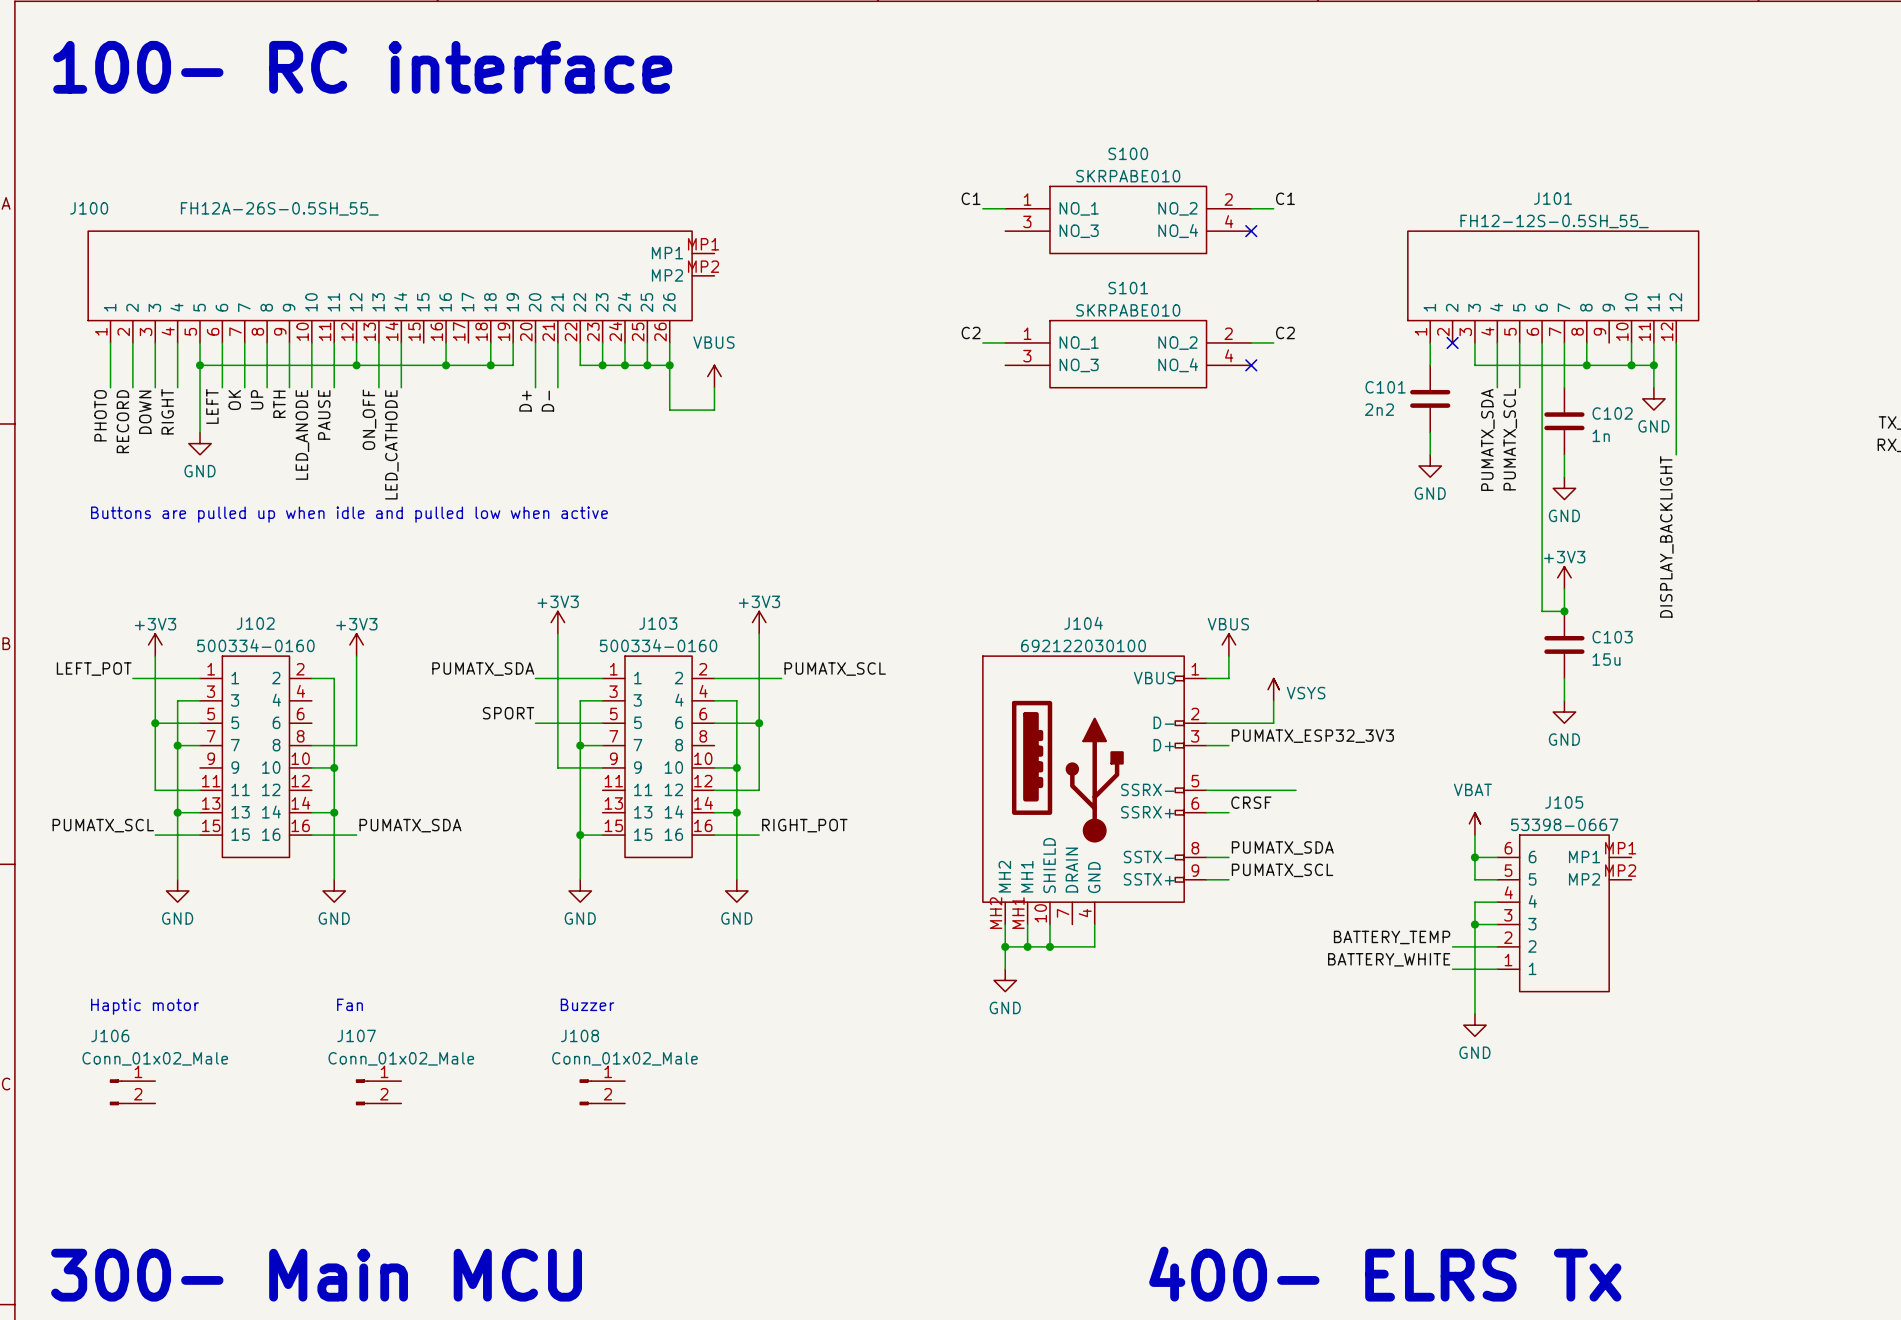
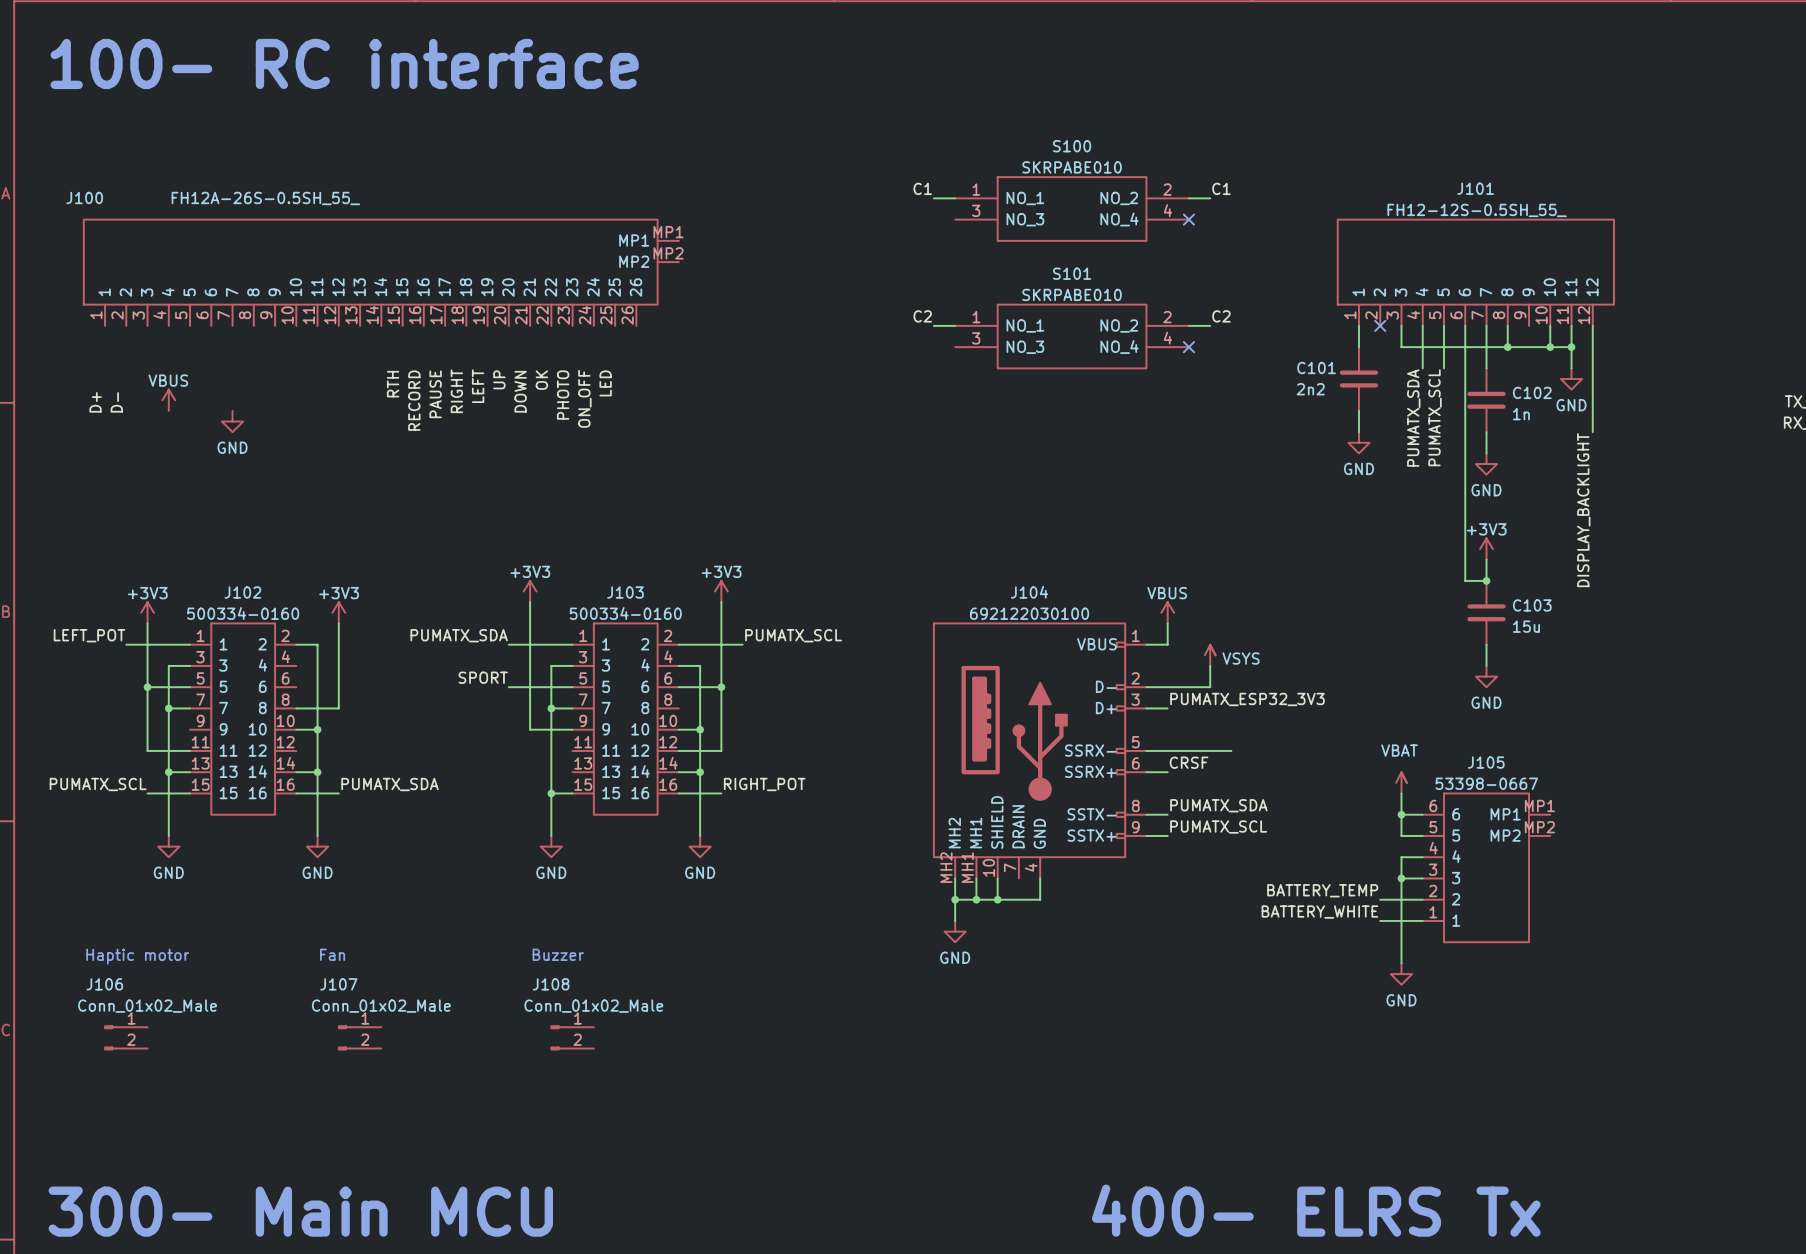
wire: (110, 342) (110, 387) -> none
wire: (132, 342) (132, 387) -> none
wire: (155, 342) (155, 387) -> none
wire: (177, 342) (177, 387) -> none
wire: (200, 342) (200, 432) -> none
wire: (222, 342) (222, 387) -> none
wire: (244, 342) (244, 387) -> none
wire: (267, 342) (267, 387) -> none
wire: (289, 342) (289, 387) -> none
wire: (311, 342) (311, 387) -> none
wire: (334, 342) (334, 387) -> none
wire: (356, 342) (356, 365) -> none
wire: (378, 342) (378, 387) -> none
wire: (401, 342) (401, 387) -> none
wire: (446, 342) (446, 365) -> none
wire: (490, 342) (490, 365) -> none
wire: (513, 342) (513, 365) (200, 365) -> none
wire: (535, 342) (535, 387) -> none
wire: (557, 342) (557, 387) -> none
wire: (580, 342) (580, 365) (669, 365) -> none
wire: (602, 342) (602, 365) -> none
wire: (624, 342) (624, 365) -> none
wire: (647, 342) (647, 365) -> none
wire: (669, 342) (669, 410) (714, 410) (714, 387) -> none
junction: (200, 365) -> none
junction: (356, 365) -> none
junction: (446, 365) -> none
junction: (490, 365) -> none
junction: (602, 365) -> none
junction: (624, 365) -> none
junction: (647, 365) -> none
junction: (669, 365) -> none
power symbol: VBUS (714, 376) -> none
label: UP (257, 399) -> none
label: OK (234, 400) -> none
label: none -> OK (541, 380)
label: D+ (525, 401) -> UP (499, 379)
label: D- (547, 401) -> DOWN (520, 391)
label: none -> LED (605, 383)
label position: RTH (279, 404) -> RTH (393, 384)
label: LEFT (212, 406) -> none
label: none -> LEFT (478, 386)
label: RIGHT (167, 411) -> none
label: none -> RIGHT (456, 391)
label: DOWN (145, 412) -> none
label position: PAUSE (324, 414) -> PAUSE (435, 394)
label: PHOTO (100, 415) -> none
label: none -> PHOTO (563, 395)
label: ON_OFF (369, 419) -> none
label: none -> ON_OFF (584, 398)
label: RECORD (122, 421) -> none
power symbol: none -> VBUS (168, 400)
label: none -> RECORD (414, 400)
label: none -> D+ (95, 402)
label: none -> D- (116, 402)
label: LED_ANODE (302, 434) -> none
power symbol position: GND (200, 443) -> GND (232, 421)
label: LED_CATHODE (391, 444) -> none
text: Buttons are pulled up when idle and pulled low when active (349, 514) -> none

